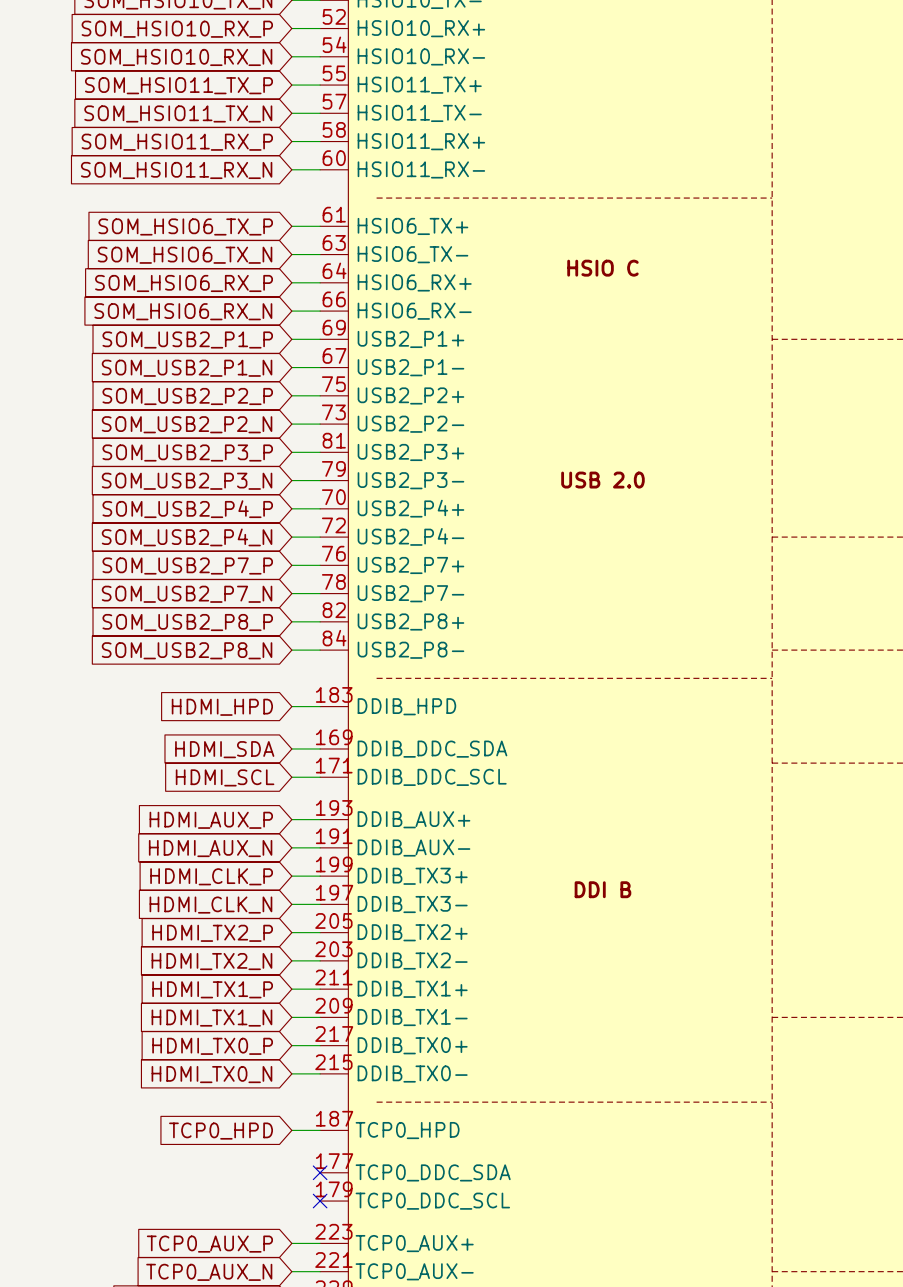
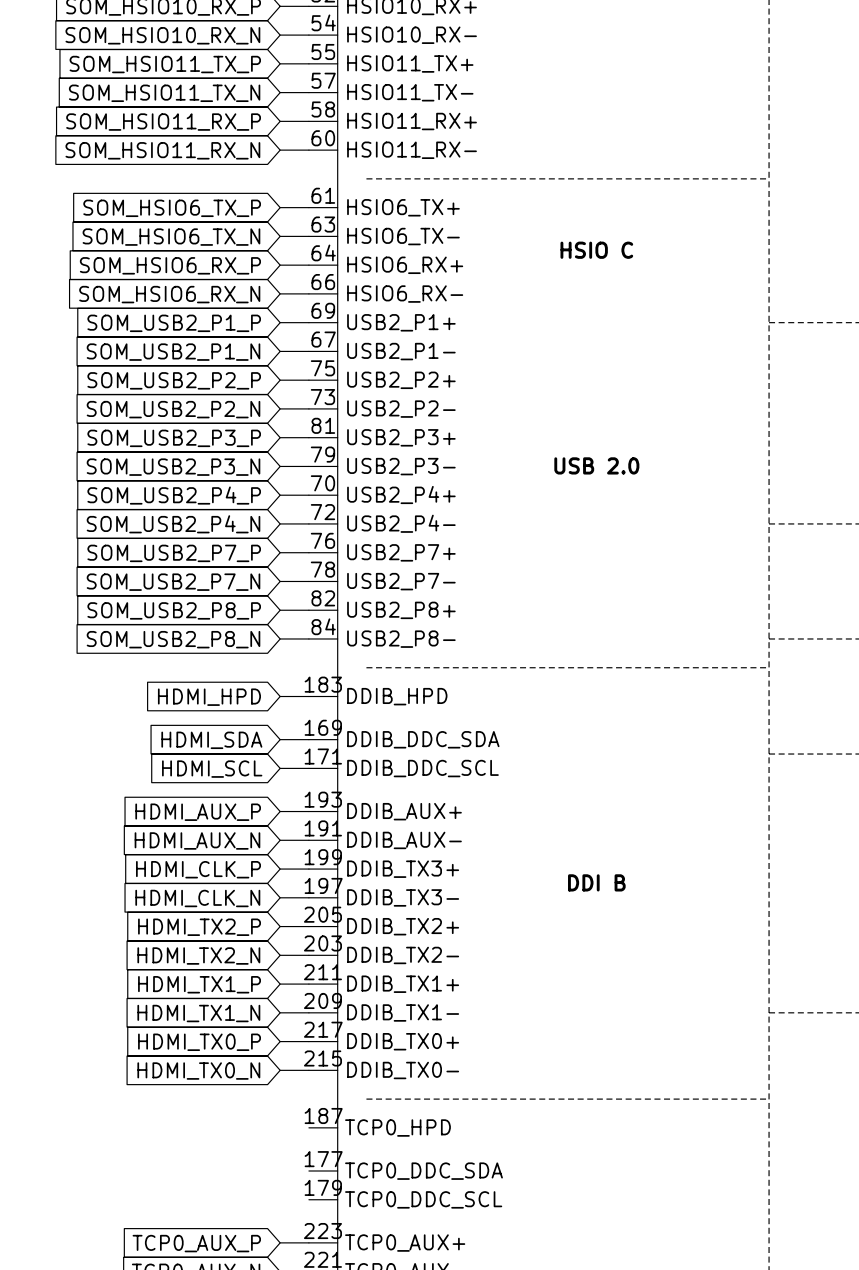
wire: (291, 1130) (320, 1130) -> none
global label: TCP0_HPD (221, 1131) -> none
no-connect mark: (320, 1172) -> none
no-connect mark: (320, 1201) -> none

